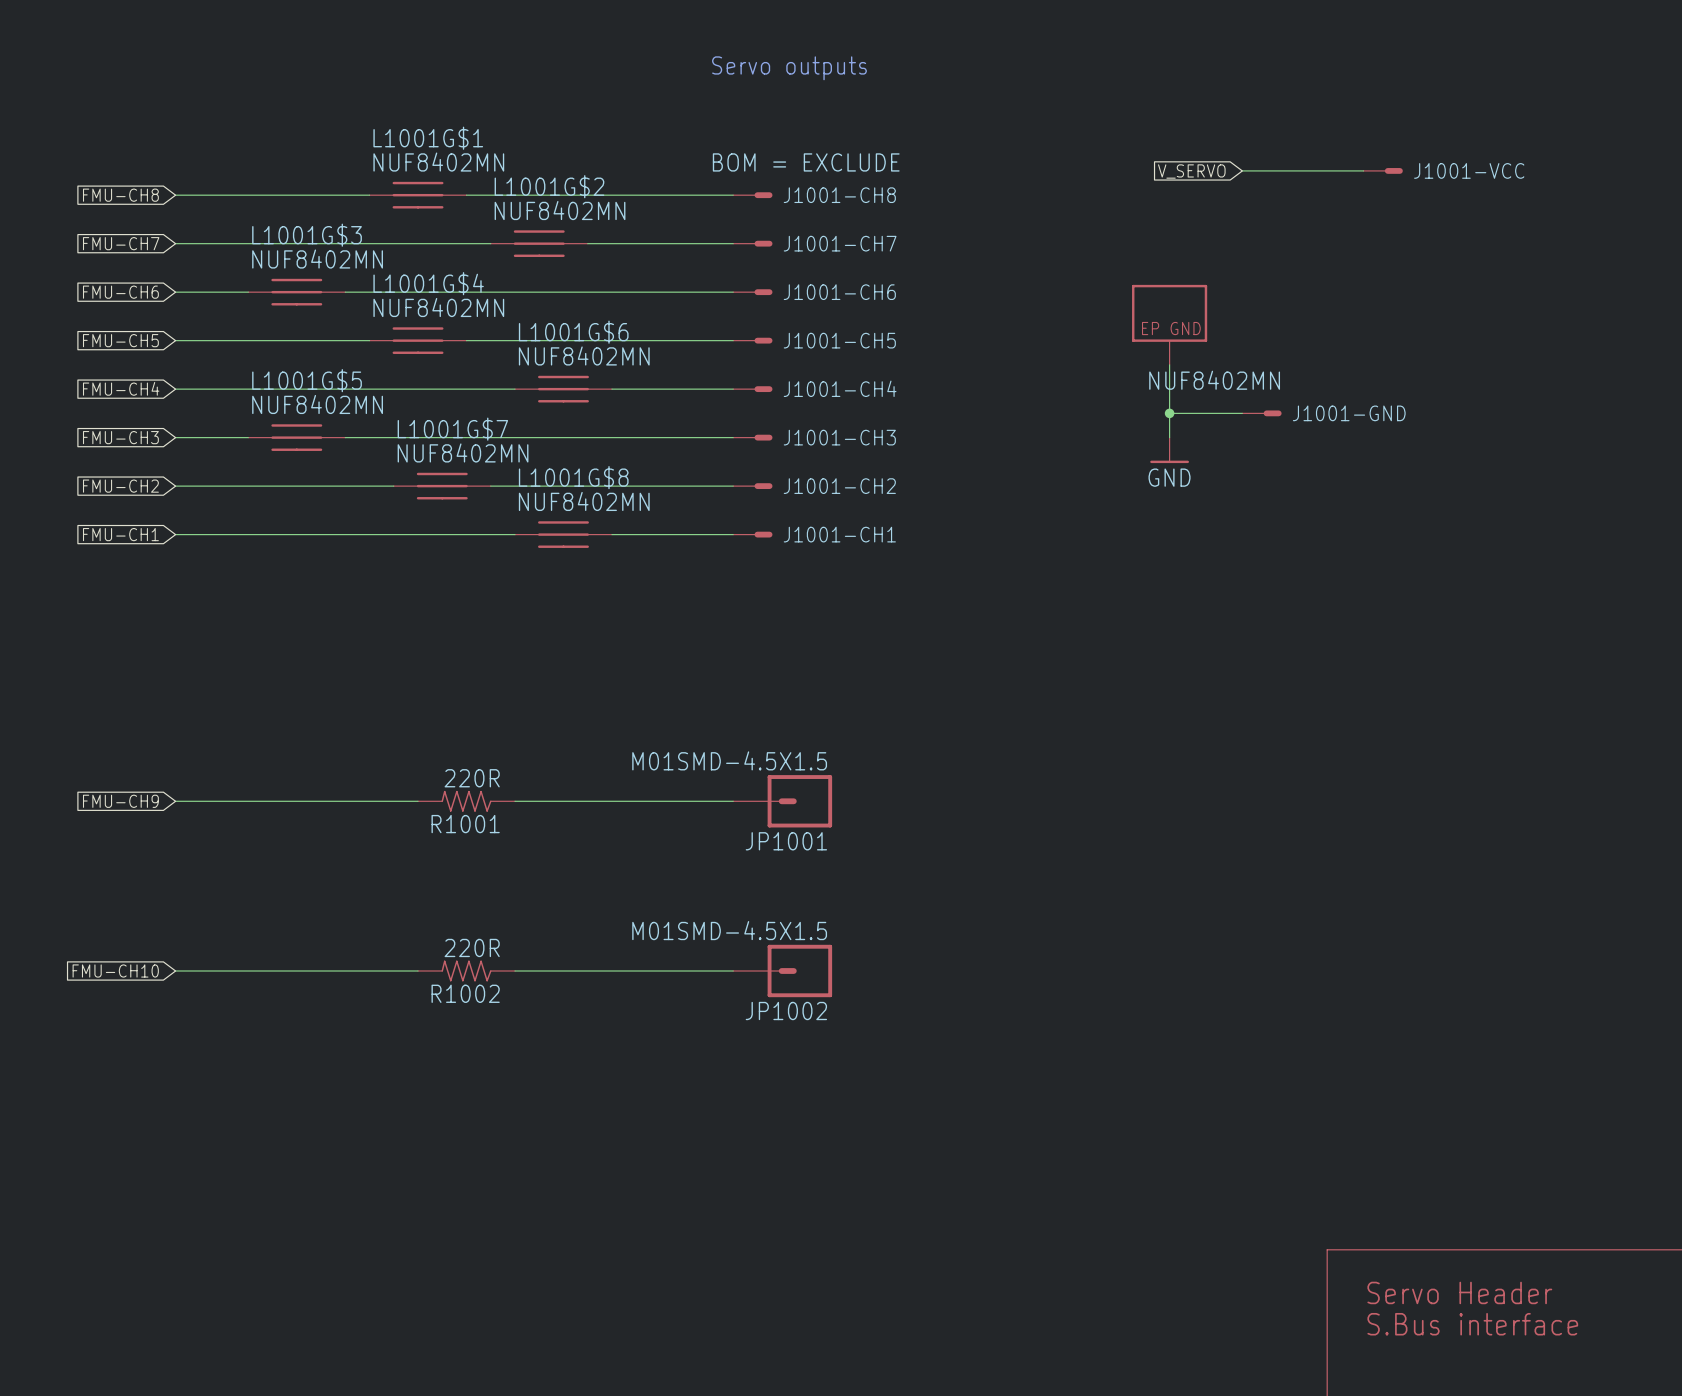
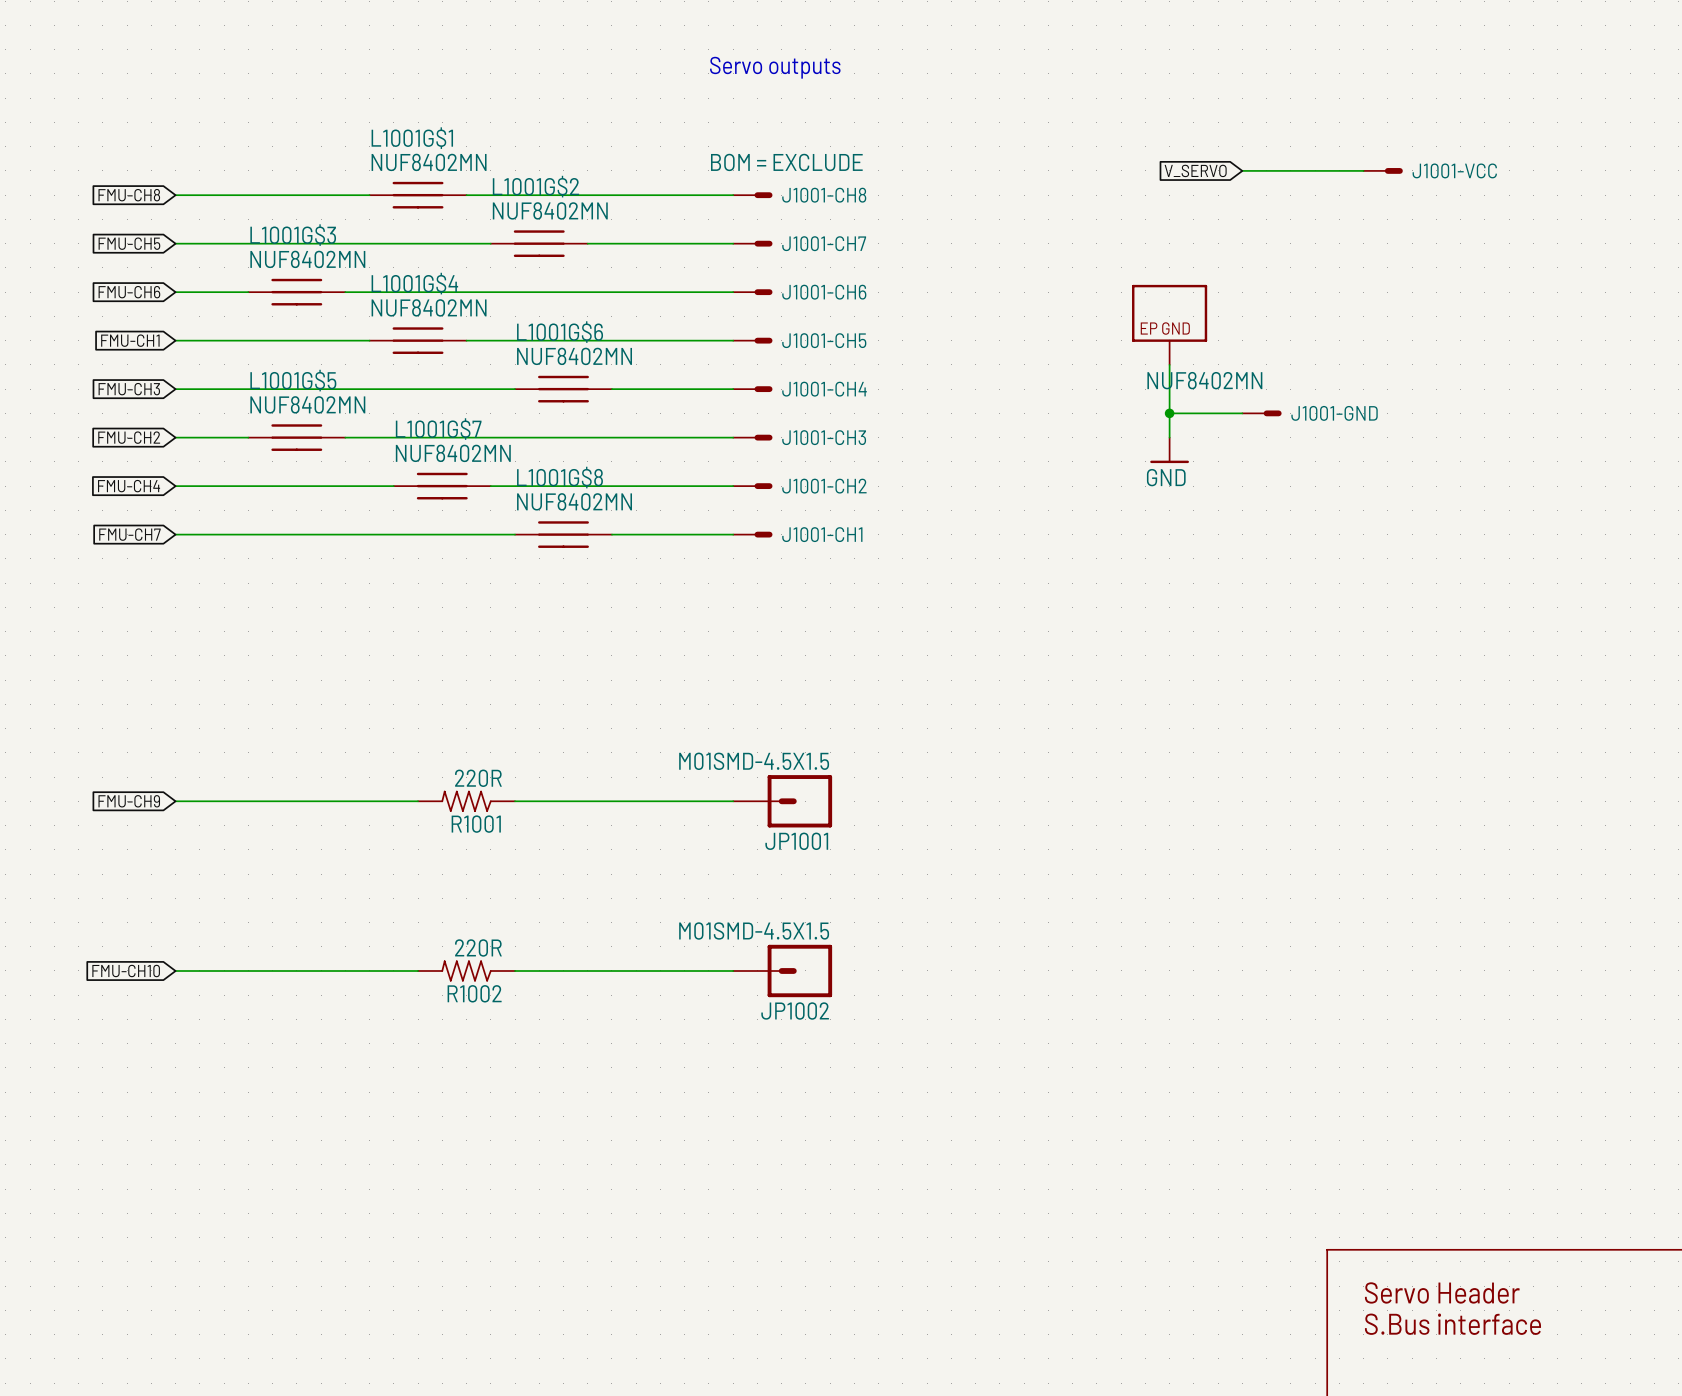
global label: FMU-CH7 (121, 243) -> FMU-CH5 (129, 243)
global label: FMU-CH5 (120, 340) -> FMU-CH1 (130, 340)
global label: FMU-CH4 (121, 388) -> FMU-CH3 (129, 389)
global label: FMU-CH3 (120, 437) -> FMU-CH2 (129, 437)
global label: FMU-CH2 (120, 486) -> FMU-CH4 (129, 486)
global label: FMU-CH1 (120, 534) -> FMU-CH7 (129, 534)

